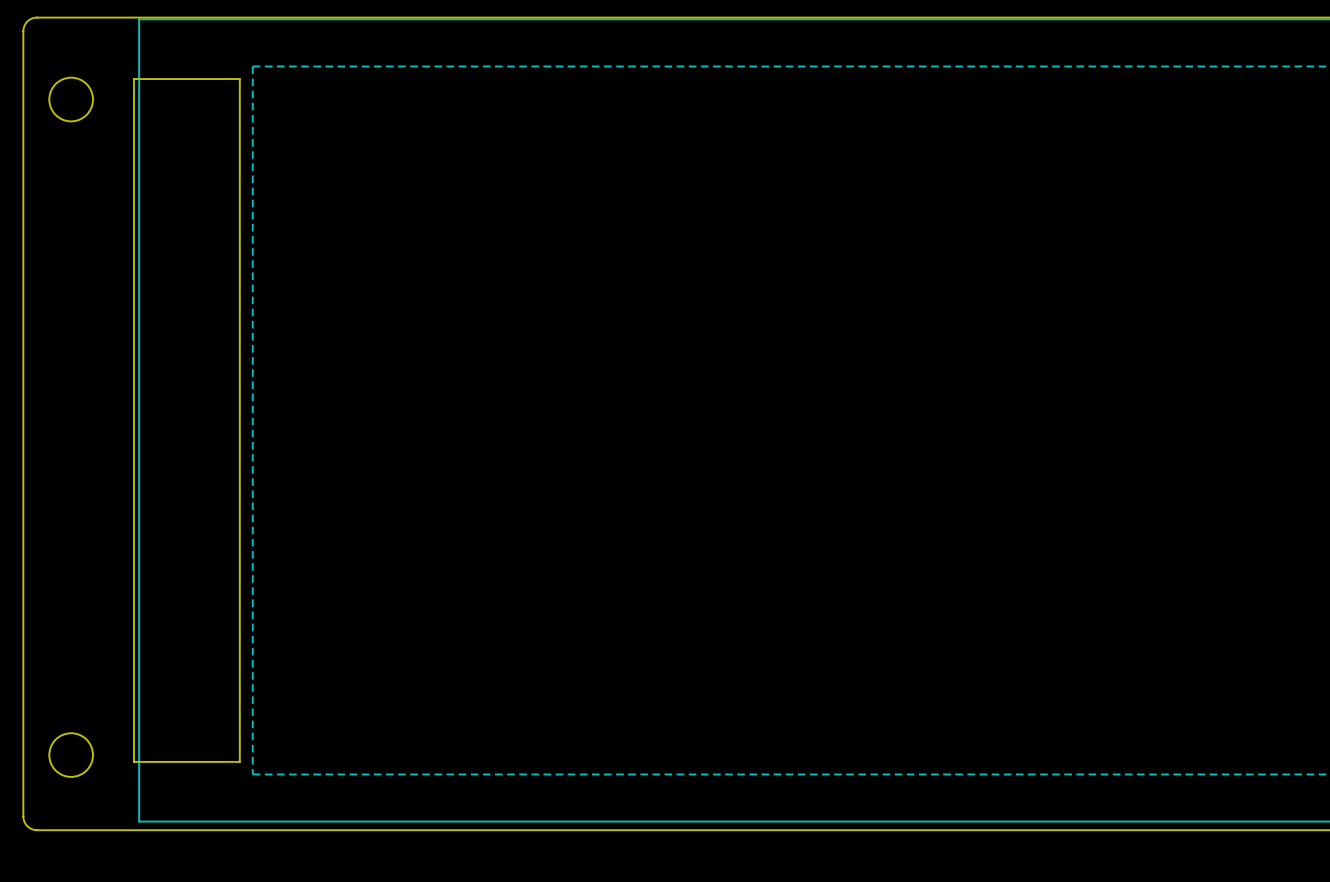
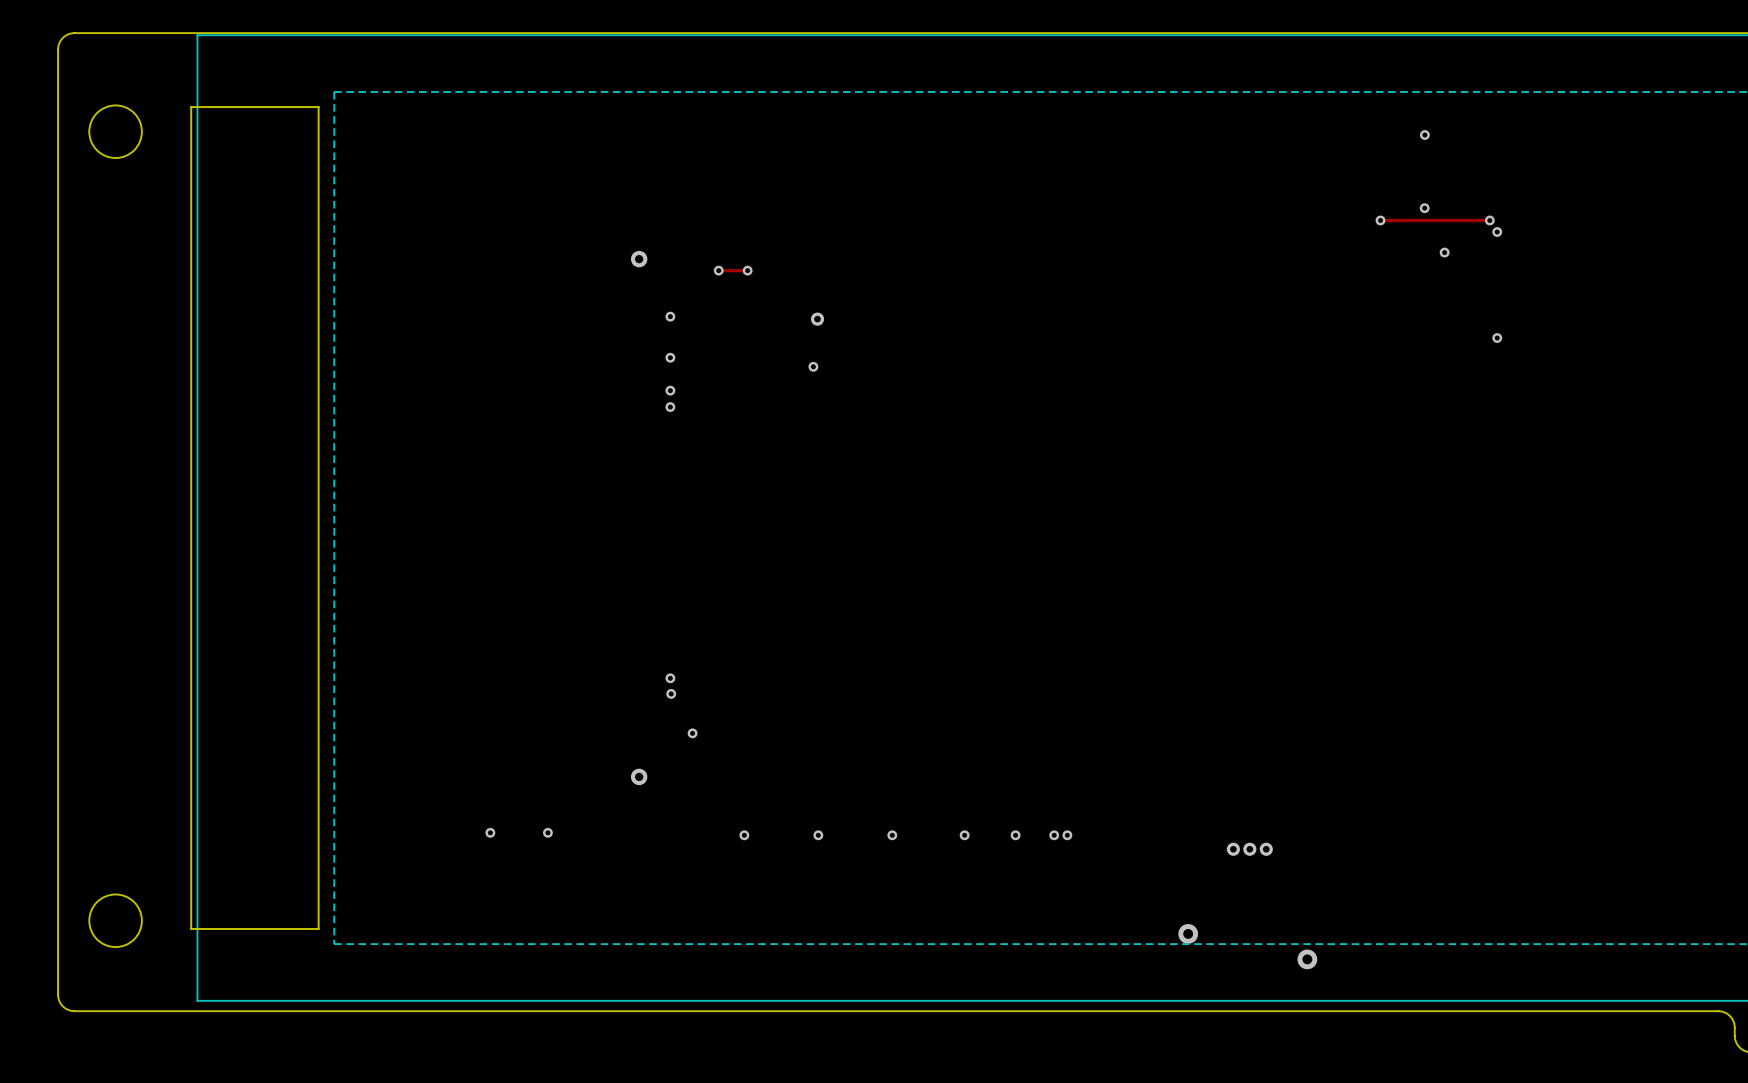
via: none -> (1424, 135)
via: none -> (1424, 208)
track: none -> (1380, 220) (1489, 220)
via: none -> (1380, 220)
via: none -> (1489, 220)
via: none -> (1497, 232)
via: none -> (1444, 252)
via: none -> (639, 259)
track: none -> (718, 270) (747, 270)
via: none -> (718, 270)
via: none -> (747, 270)
via: none -> (670, 316)
via: none -> (817, 319)
via: none -> (1497, 338)
via: none -> (670, 357)
via: none -> (813, 366)
via: none -> (670, 390)
via: none -> (670, 407)
via: none -> (670, 678)
via: none -> (671, 693)
via: none -> (692, 733)
via: none -> (639, 776)
via: none -> (490, 832)
via: none -> (547, 832)
via: none -> (744, 835)
via: none -> (818, 835)
via: none -> (892, 835)
via: none -> (964, 835)
via: none -> (1015, 835)
via: none -> (1054, 835)
via: none -> (1067, 835)
via: none -> (1233, 849)
via: none -> (1249, 849)
via: none -> (1266, 849)
via: none -> (1188, 933)
via: none -> (1307, 959)

